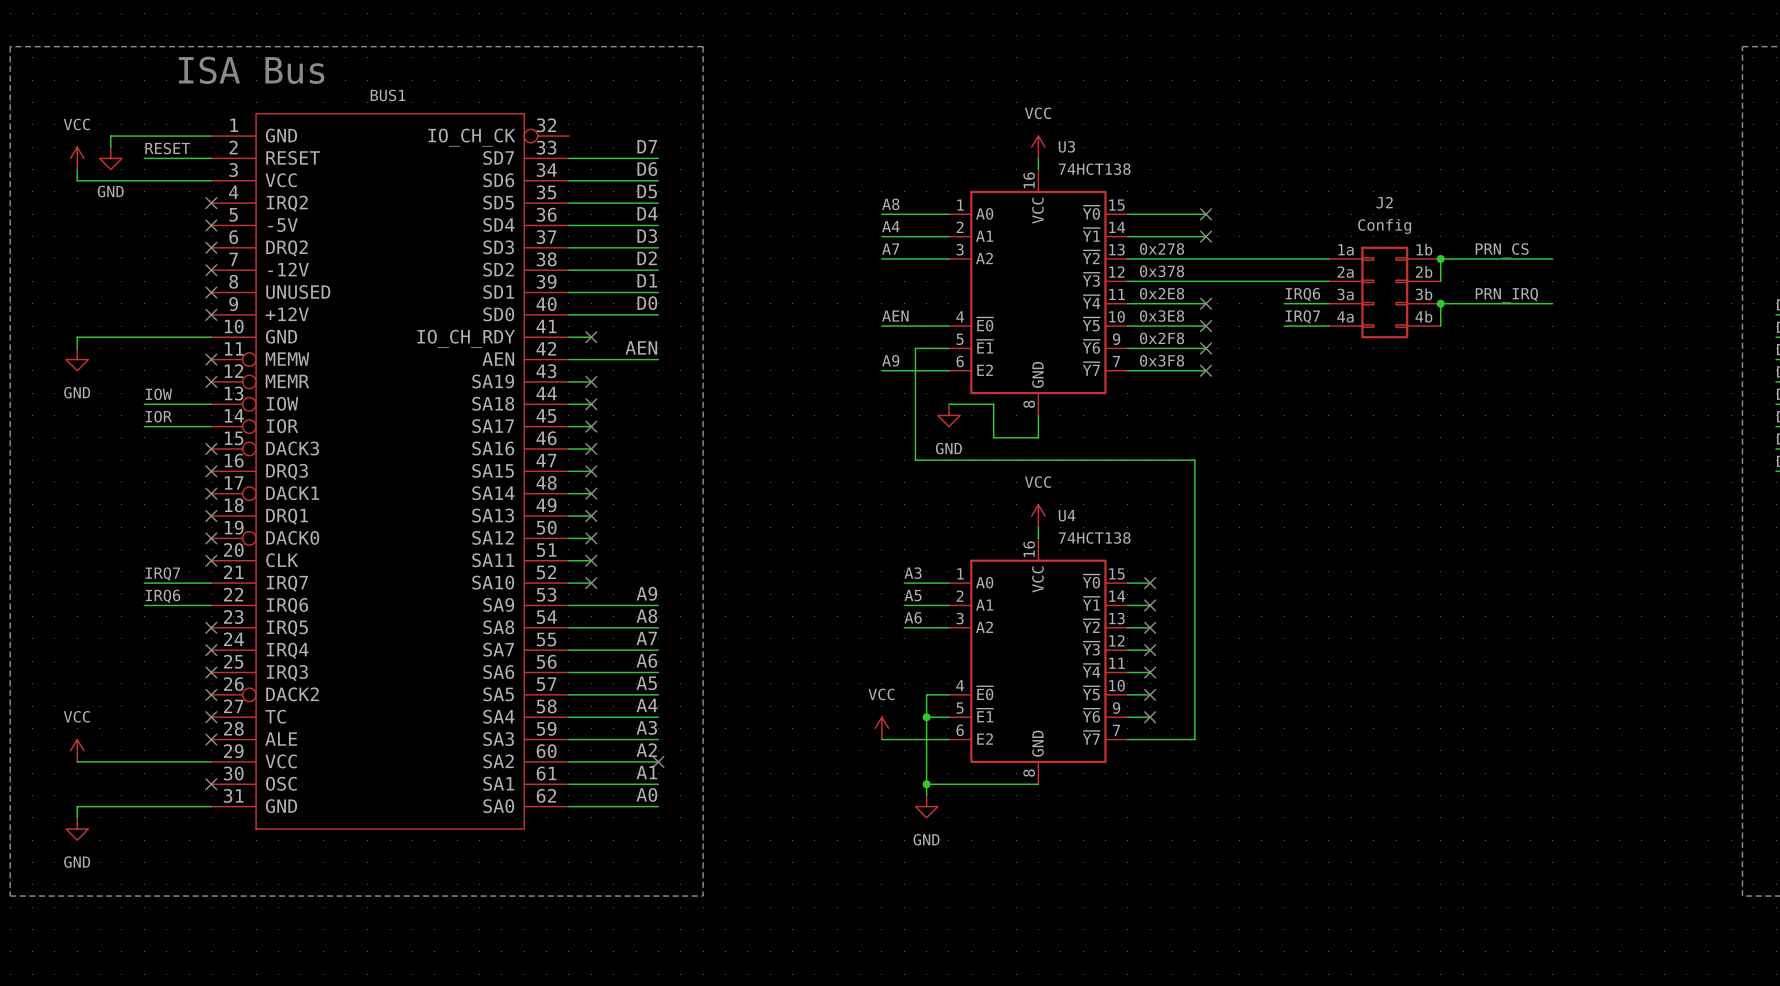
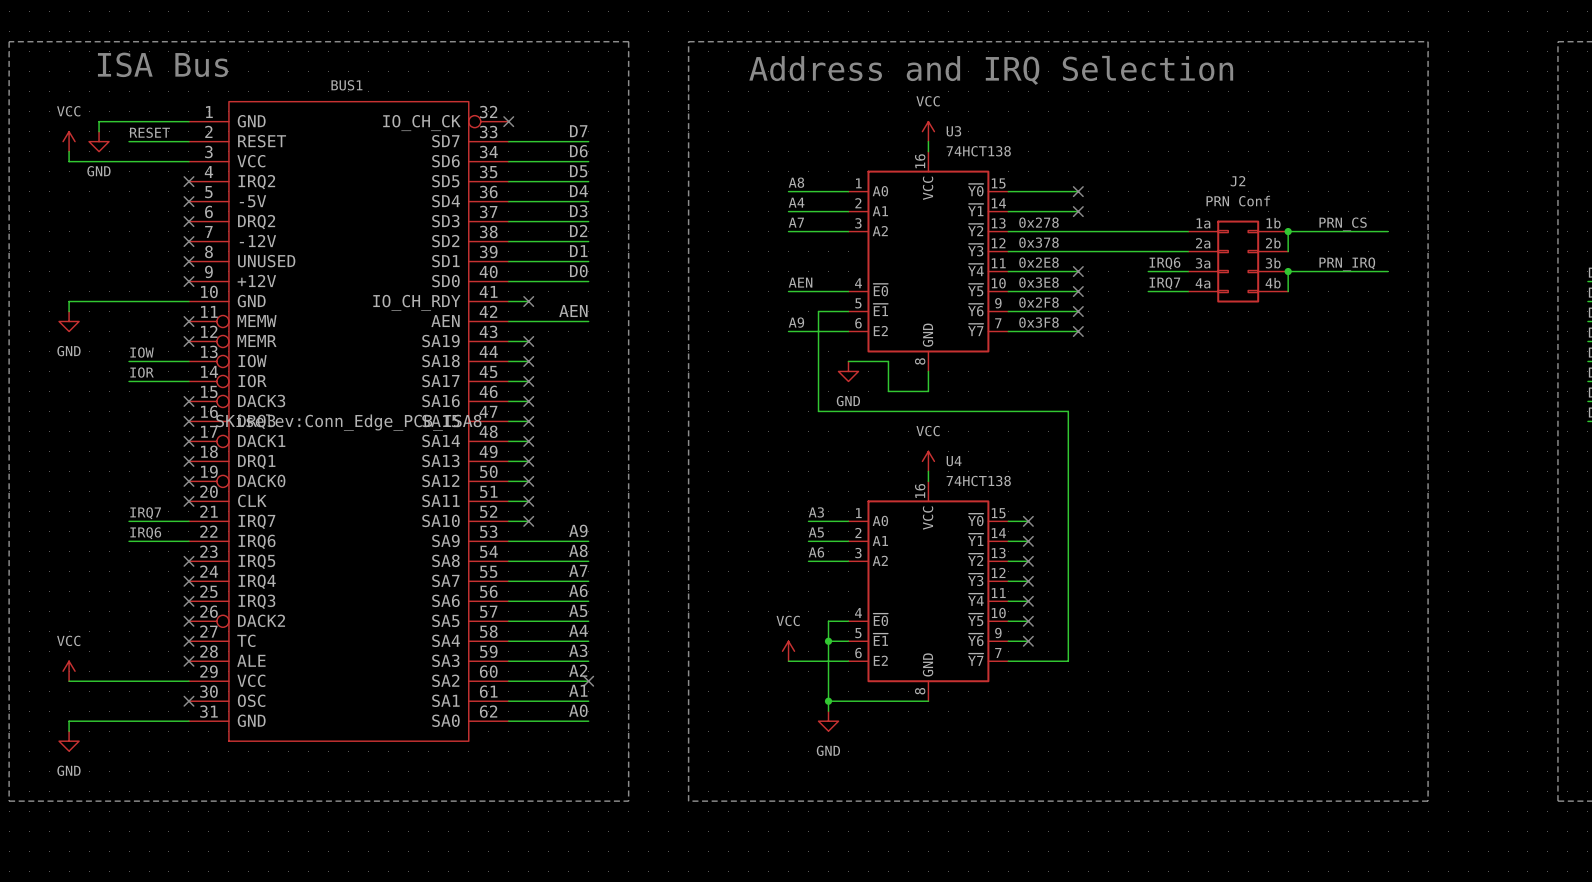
line: none -> (688, 41) (1428, 41) (1428, 801) (688, 801) (688, 41)
text position: ISA Bus (251, 70) -> ISA Bus (162, 64)
text: none -> Address and IRQ Selection (991, 70)
no-connect mark: none -> (508, 121)
J2 value: Config (1384, 226) -> PRN Conf (1238, 201)
BUS1 text: none -> SKiselev:Conn_Edge_PCB_ISA8 (348, 422)

